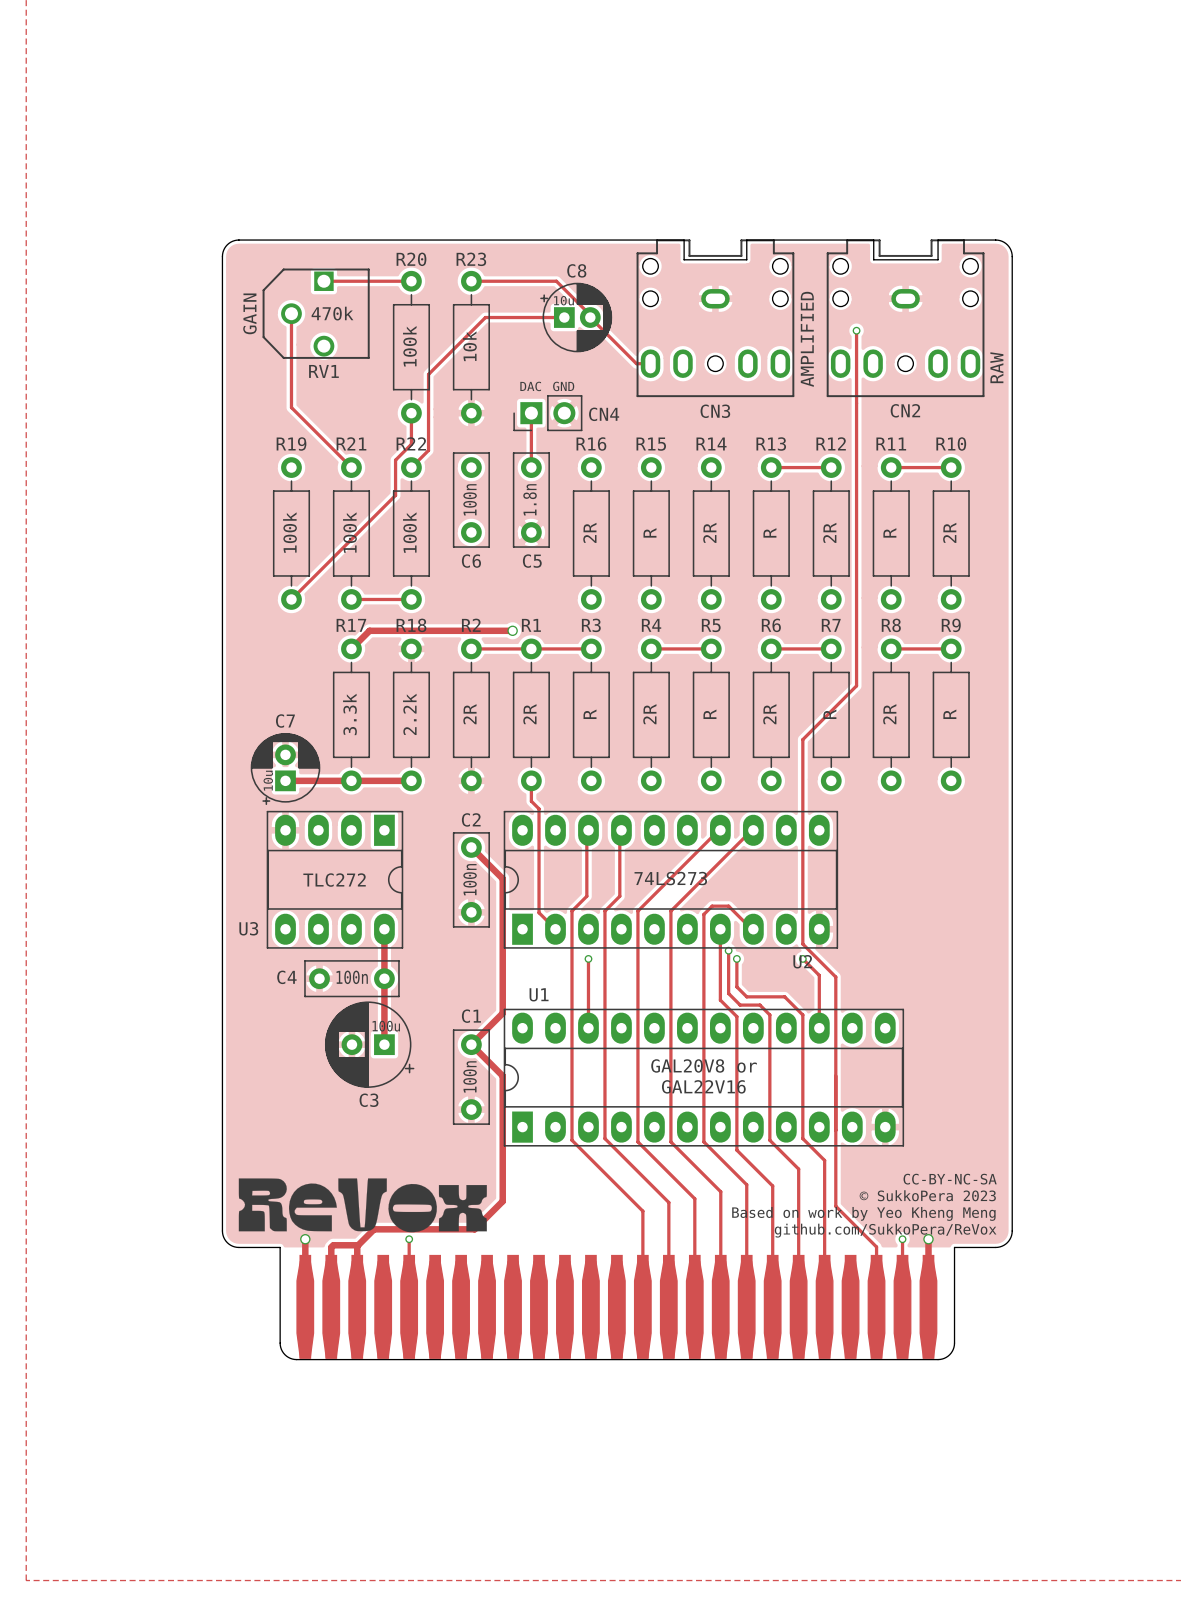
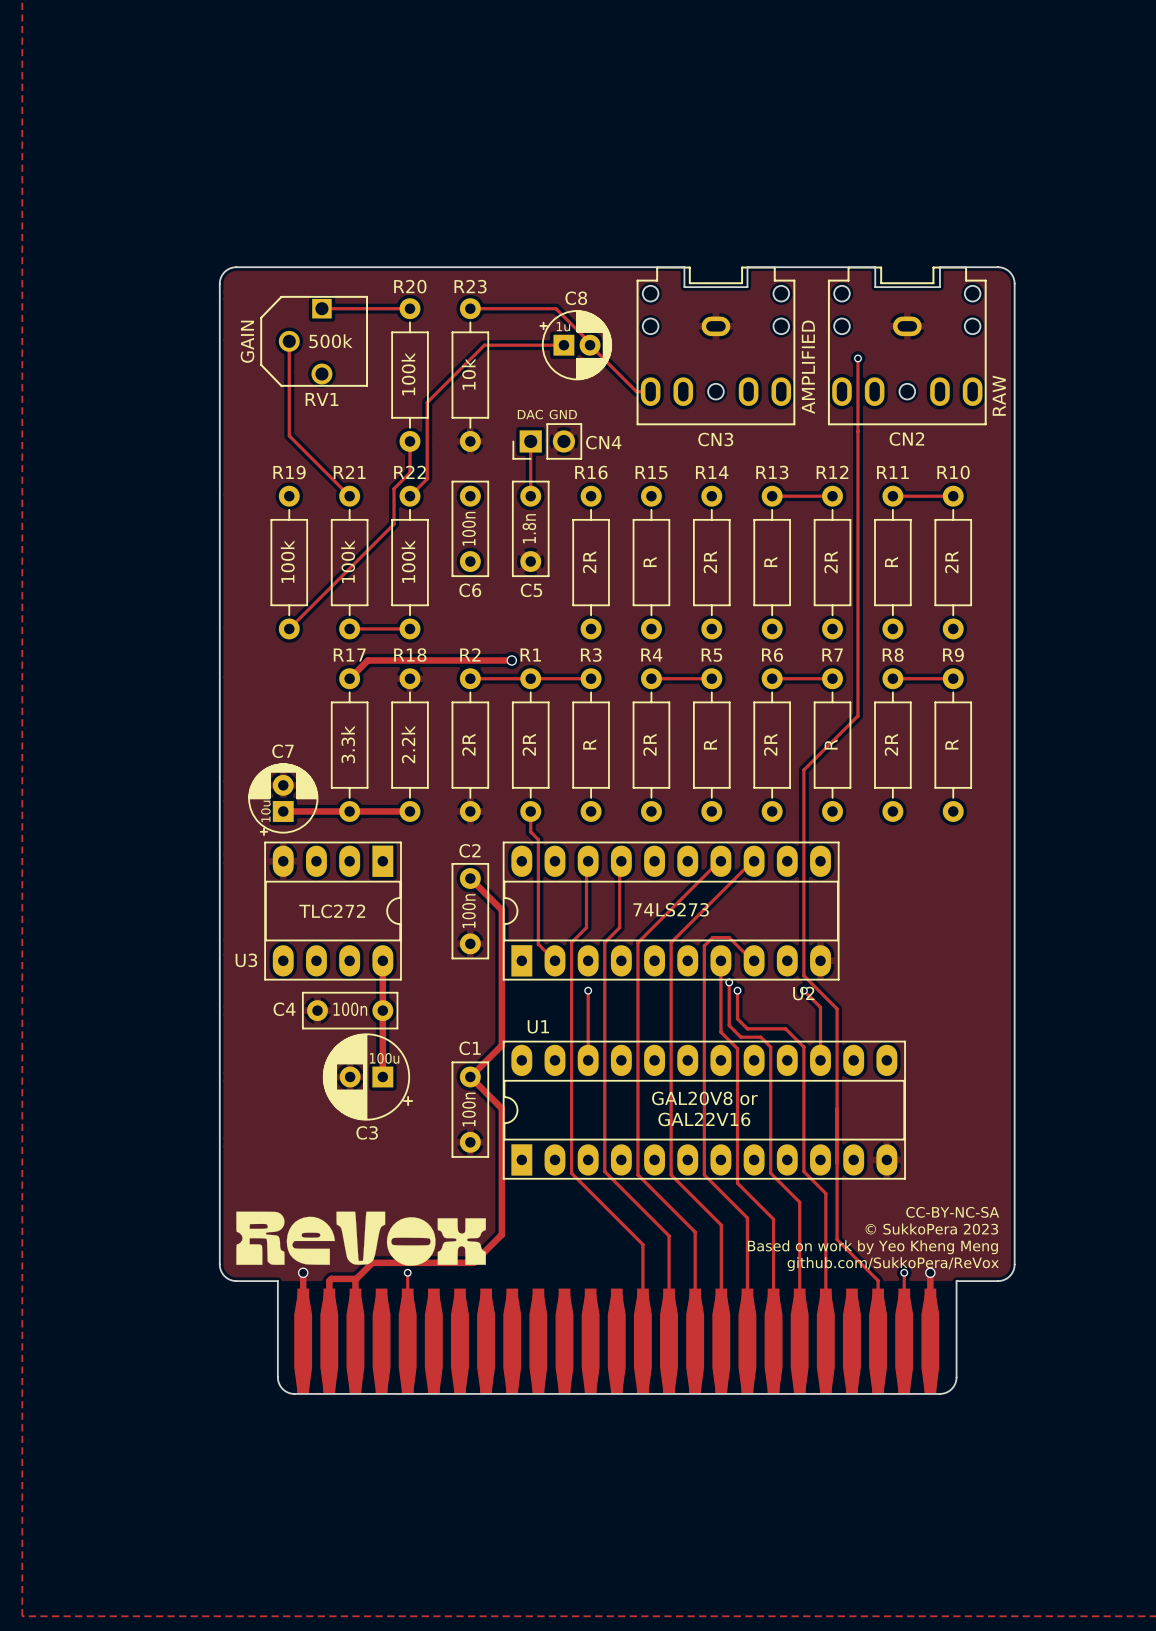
C8 value: 10u (563, 300) -> 1u (563, 326)
RV1 value: 470k (332, 313) -> 500k (330, 341)

